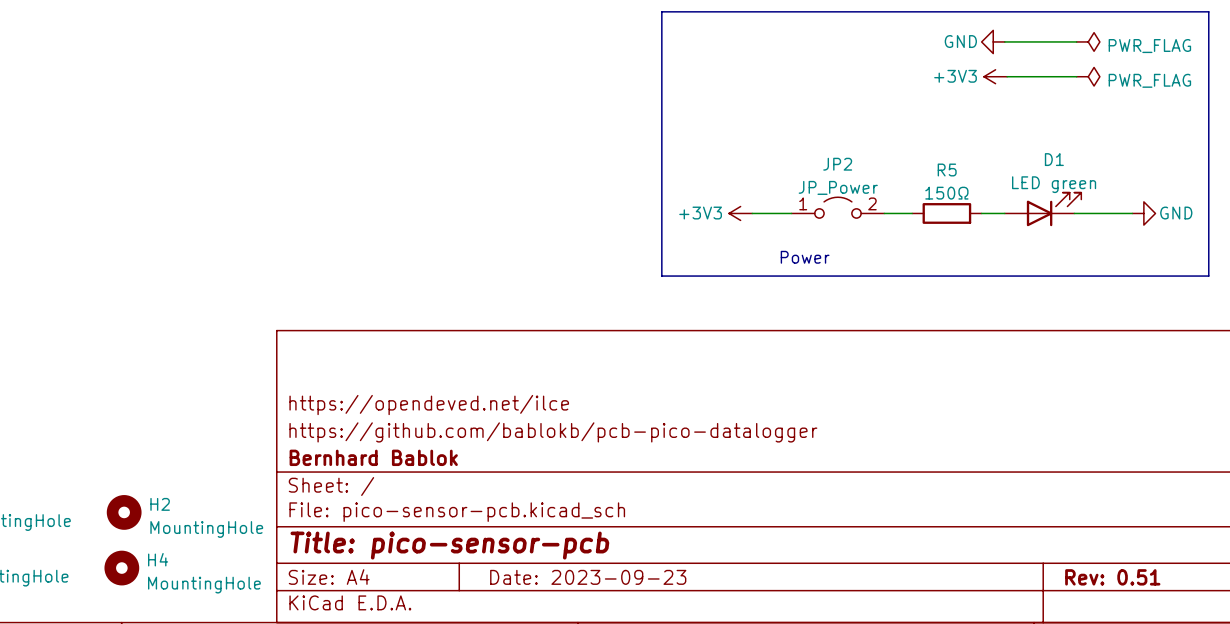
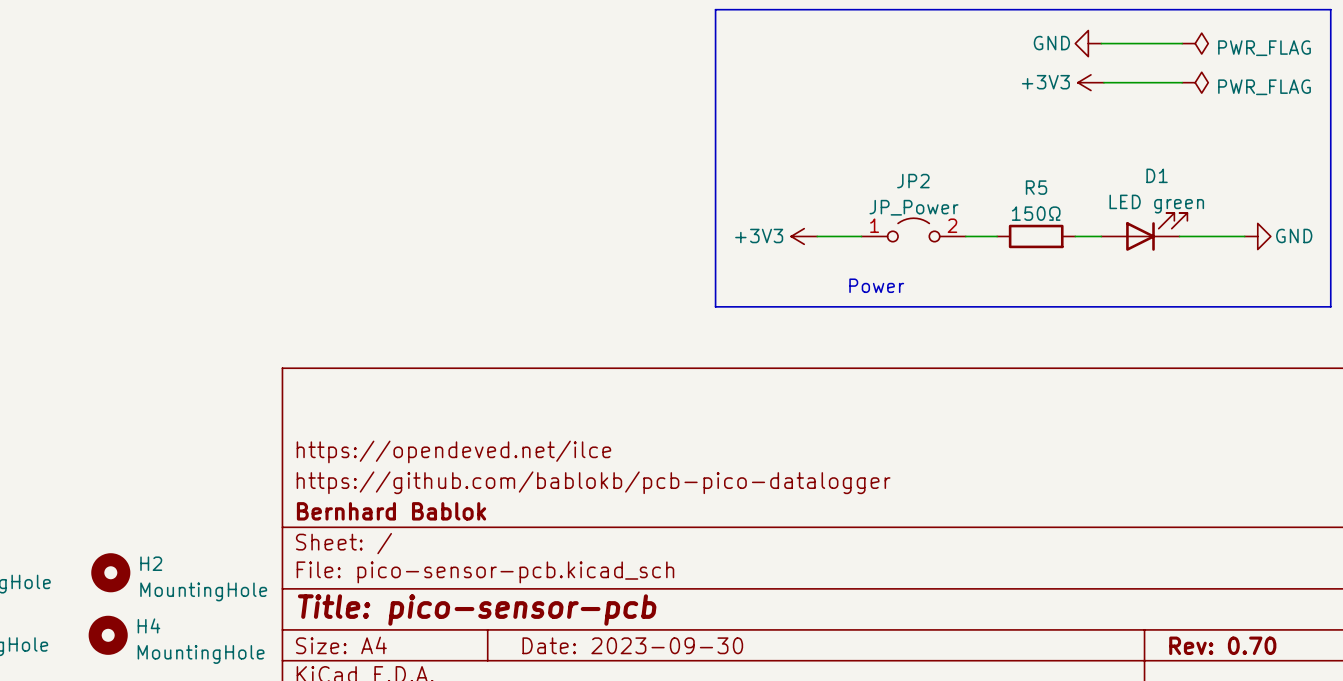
title block: Date: 2023-09-23 (588, 577) -> Date: 2023-09-30 (632, 645)
title block: Rev: 0.51 (1112, 577) -> Rev: 0.70 (1222, 645)

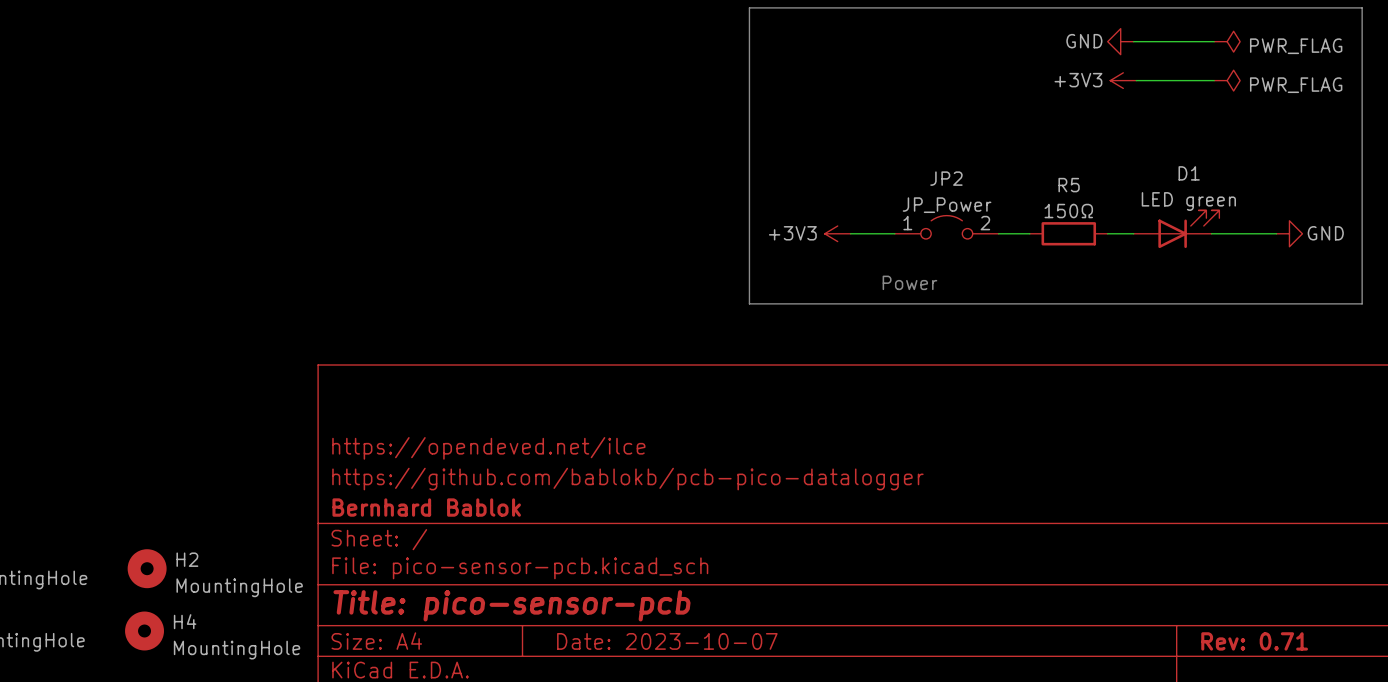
title block: Date: 2023-09-30 (632, 645) -> Date: 2023-10-07 (667, 641)
title block: Rev: 0.70 (1222, 645) -> Rev: 0.71 (1254, 641)

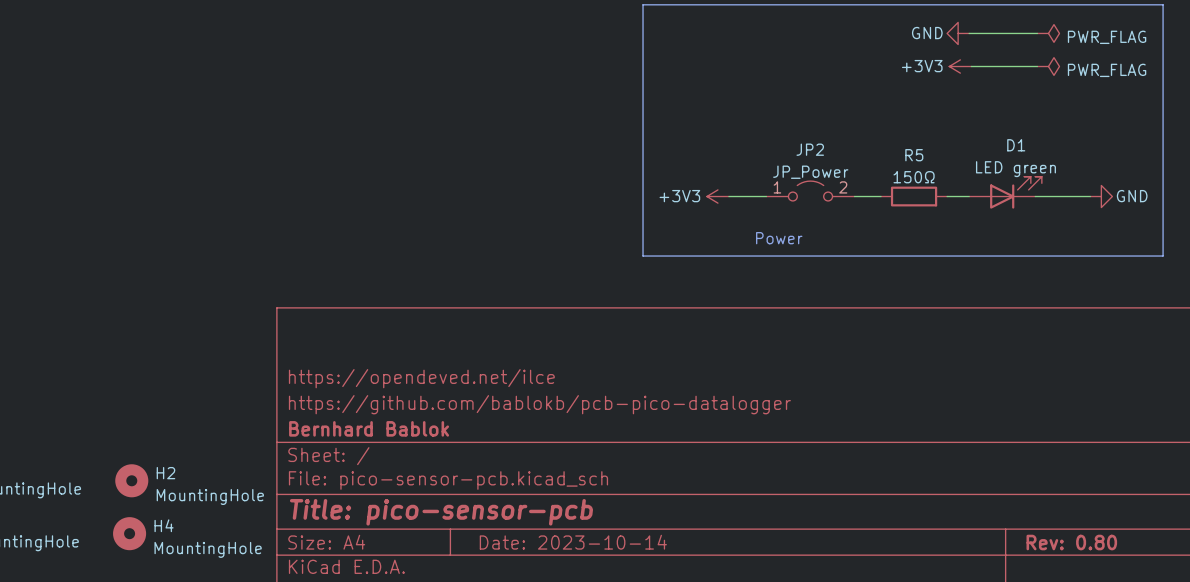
title block: Date: 2023-10-07 (667, 641) -> Date: 2023-10-14 (573, 542)
title block: Rev: 0.71 (1254, 641) -> Rev: 0.80 (1071, 542)

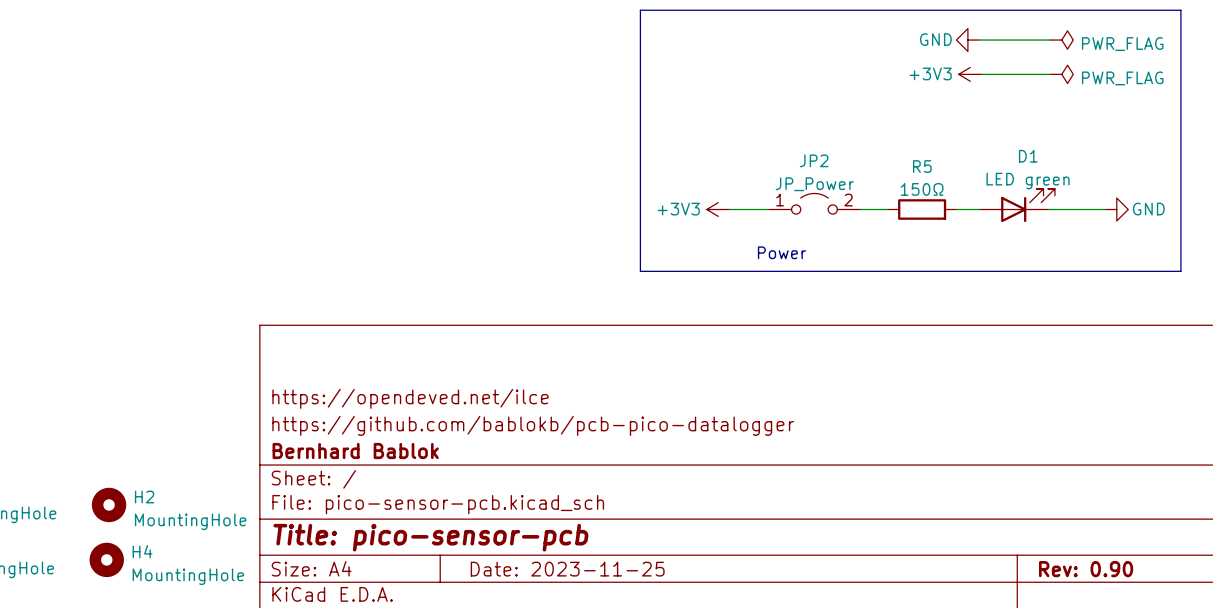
title block: Date: 2023-10-14 (573, 542) -> Date: 2023-11-25 (567, 569)
title block: Rev: 0.80 (1071, 542) -> Rev: 0.90 (1086, 569)

